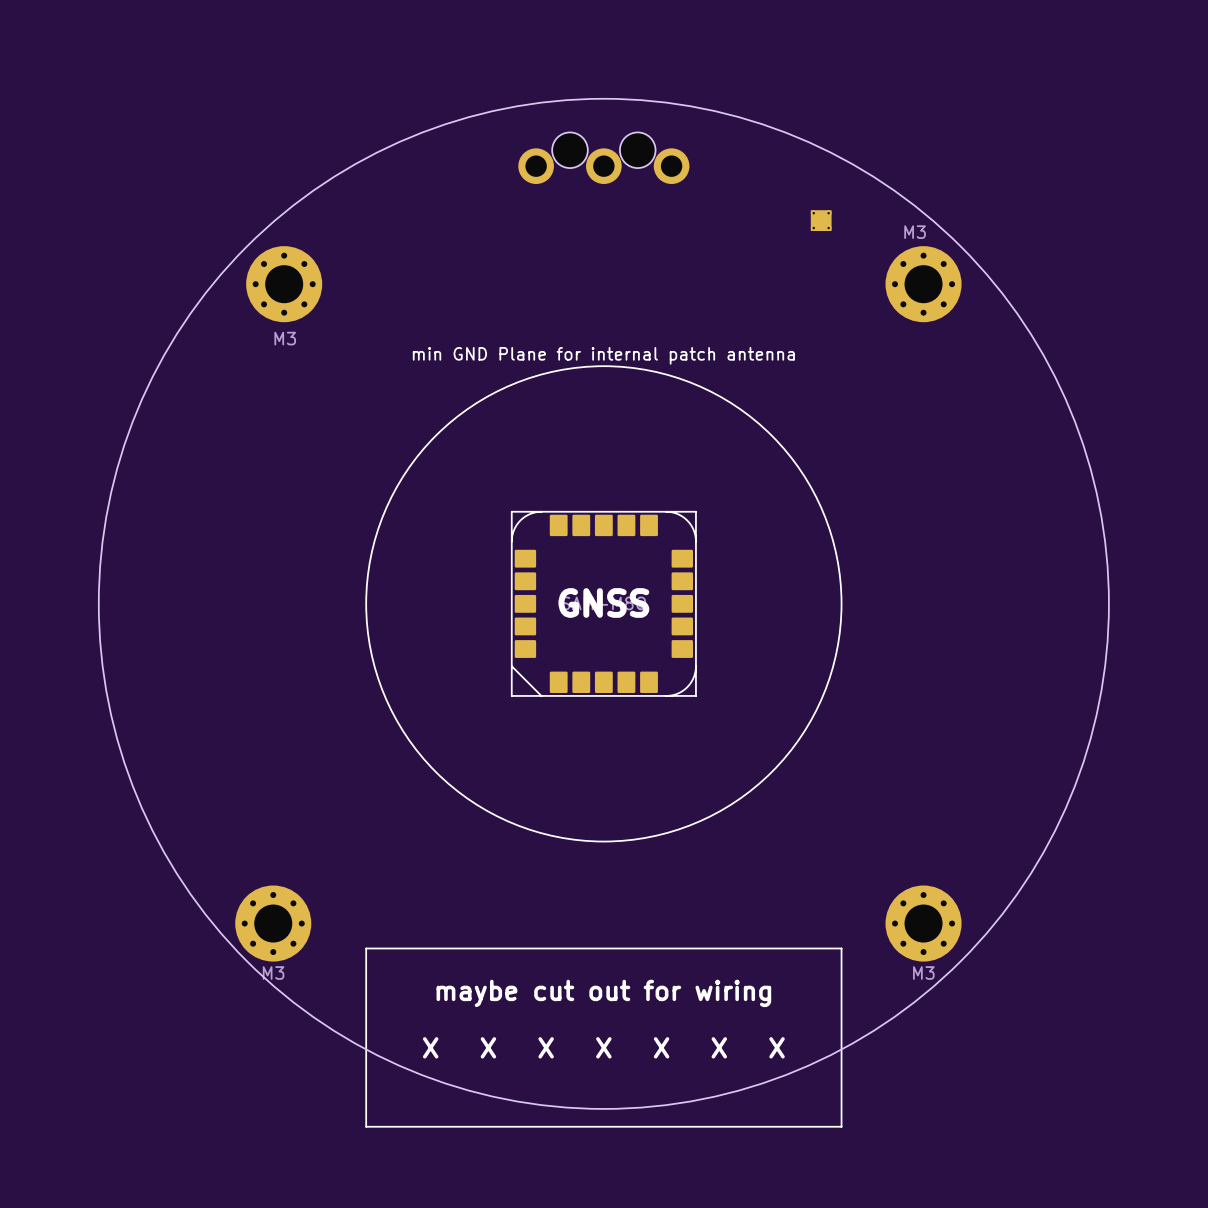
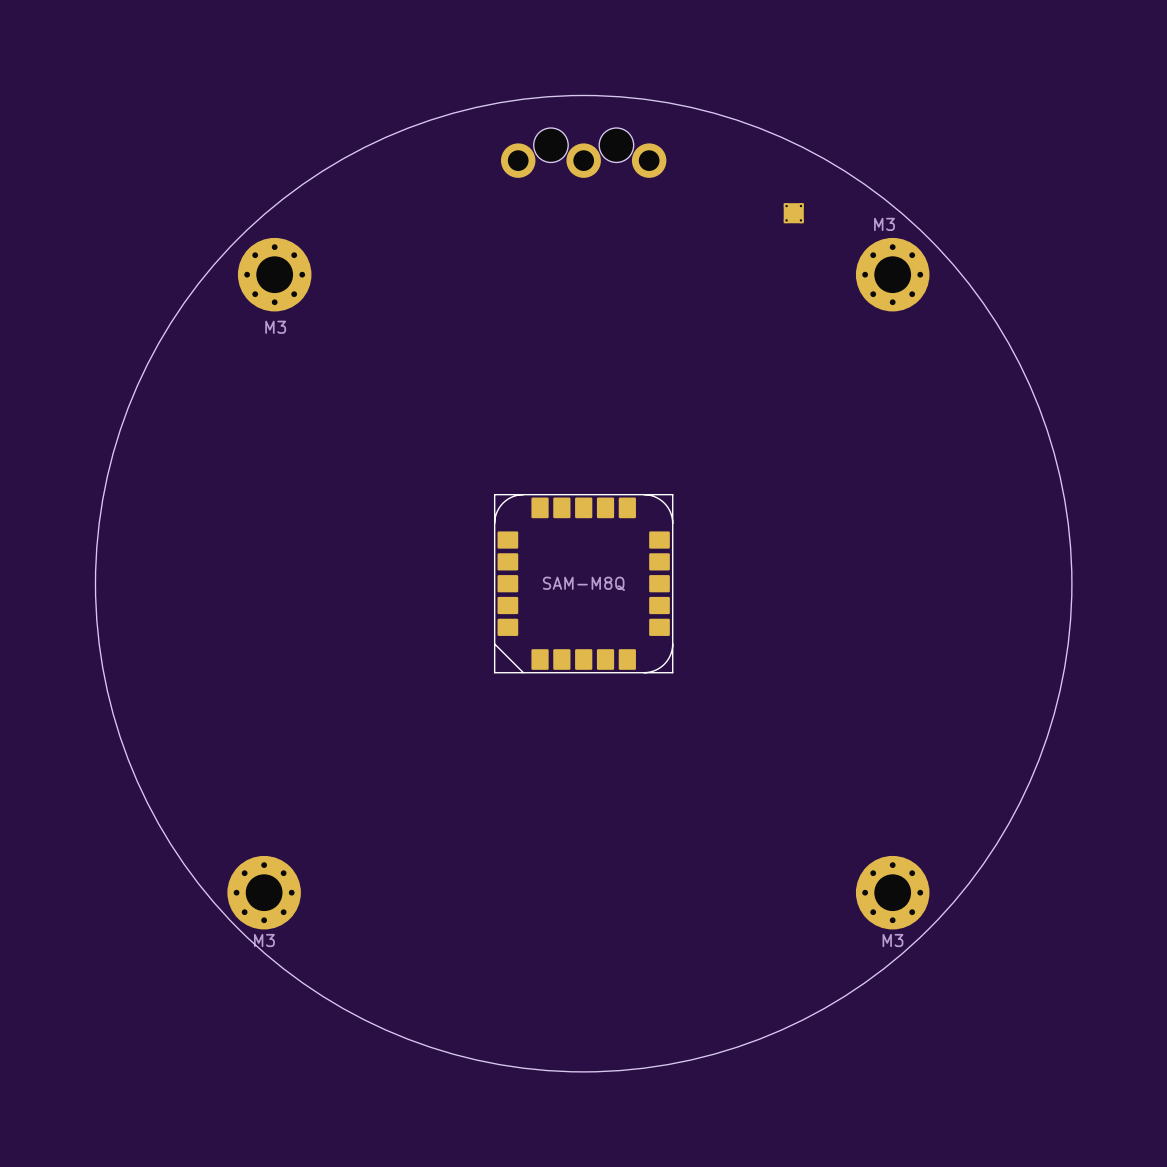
text: min GND Plane for internal patch antenna (603, 355) -> none
drawing: [365, 365, 843, 843] -> none
text: GNSS (603, 602) -> none
line: (366, 948) (841, 948) (841, 1126) (366, 1126) (366, 948) -> none
text: maybe cut out for wiring (603, 993) -> none
text: X X X X X X X (603, 1047) -> none

